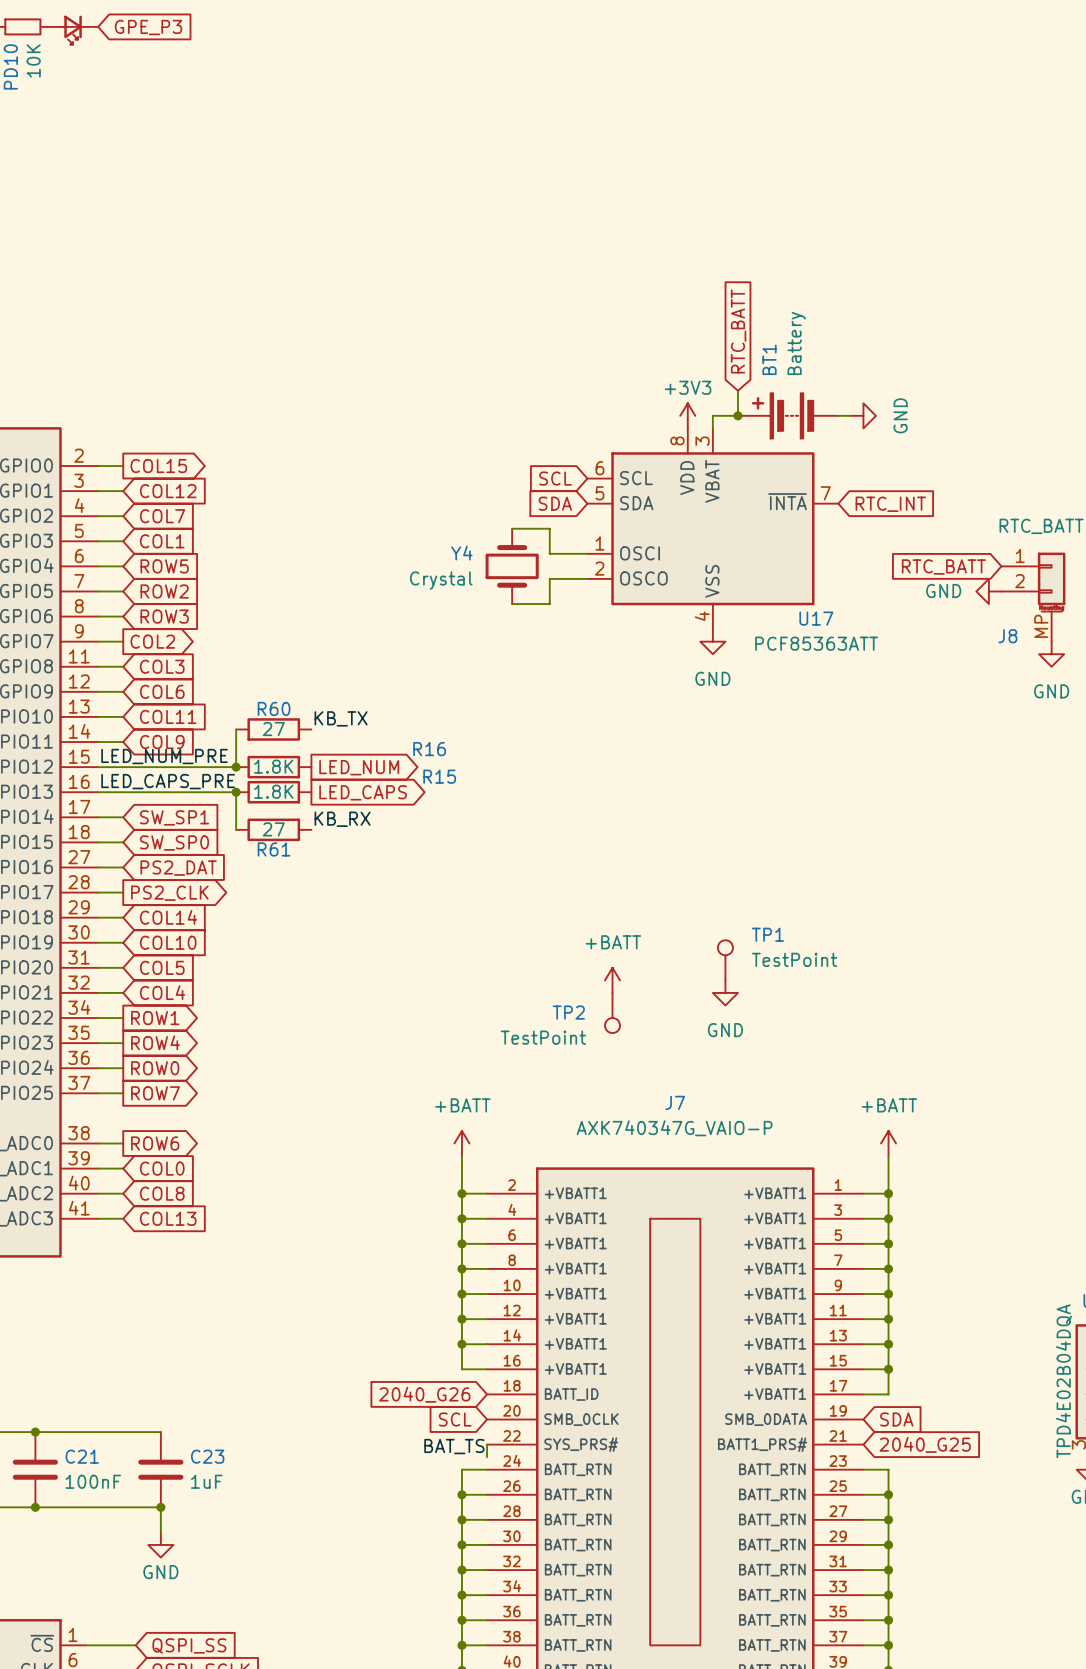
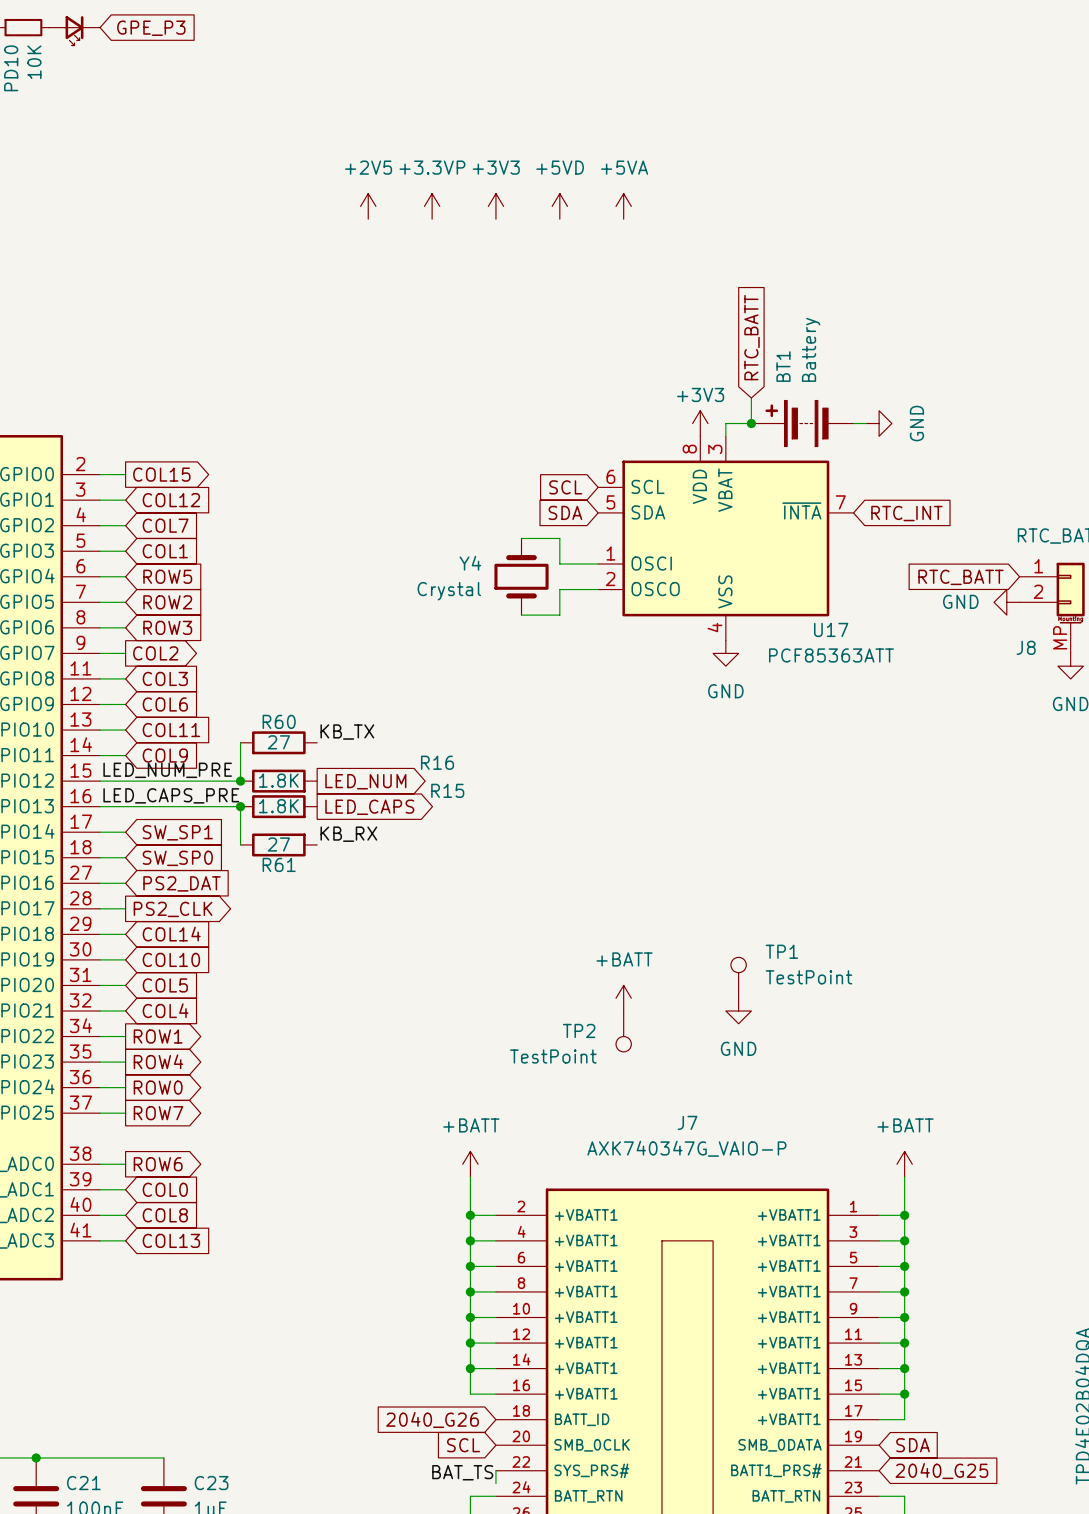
power symbol: none -> +2V5 (368, 206)
power symbol: none -> +3.3VP (432, 206)
power symbol: none -> +3V3 (495, 206)
power symbol: none -> +5VD (559, 206)
power symbol: none -> +5VA (623, 206)

